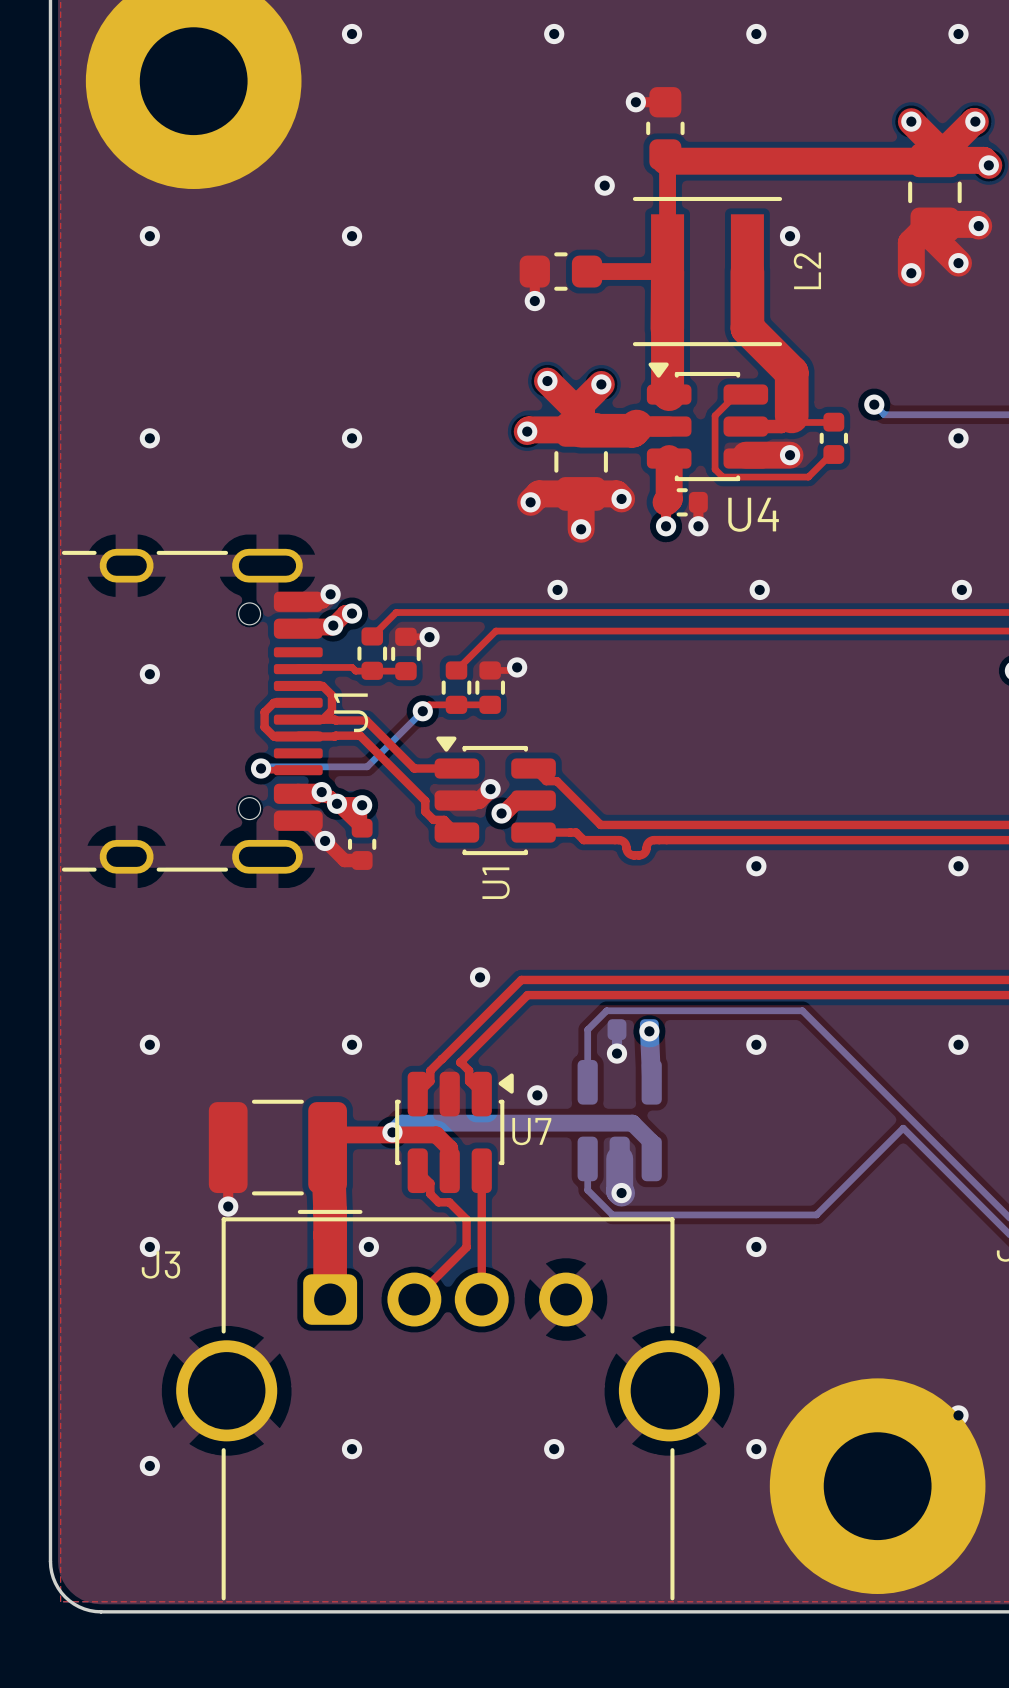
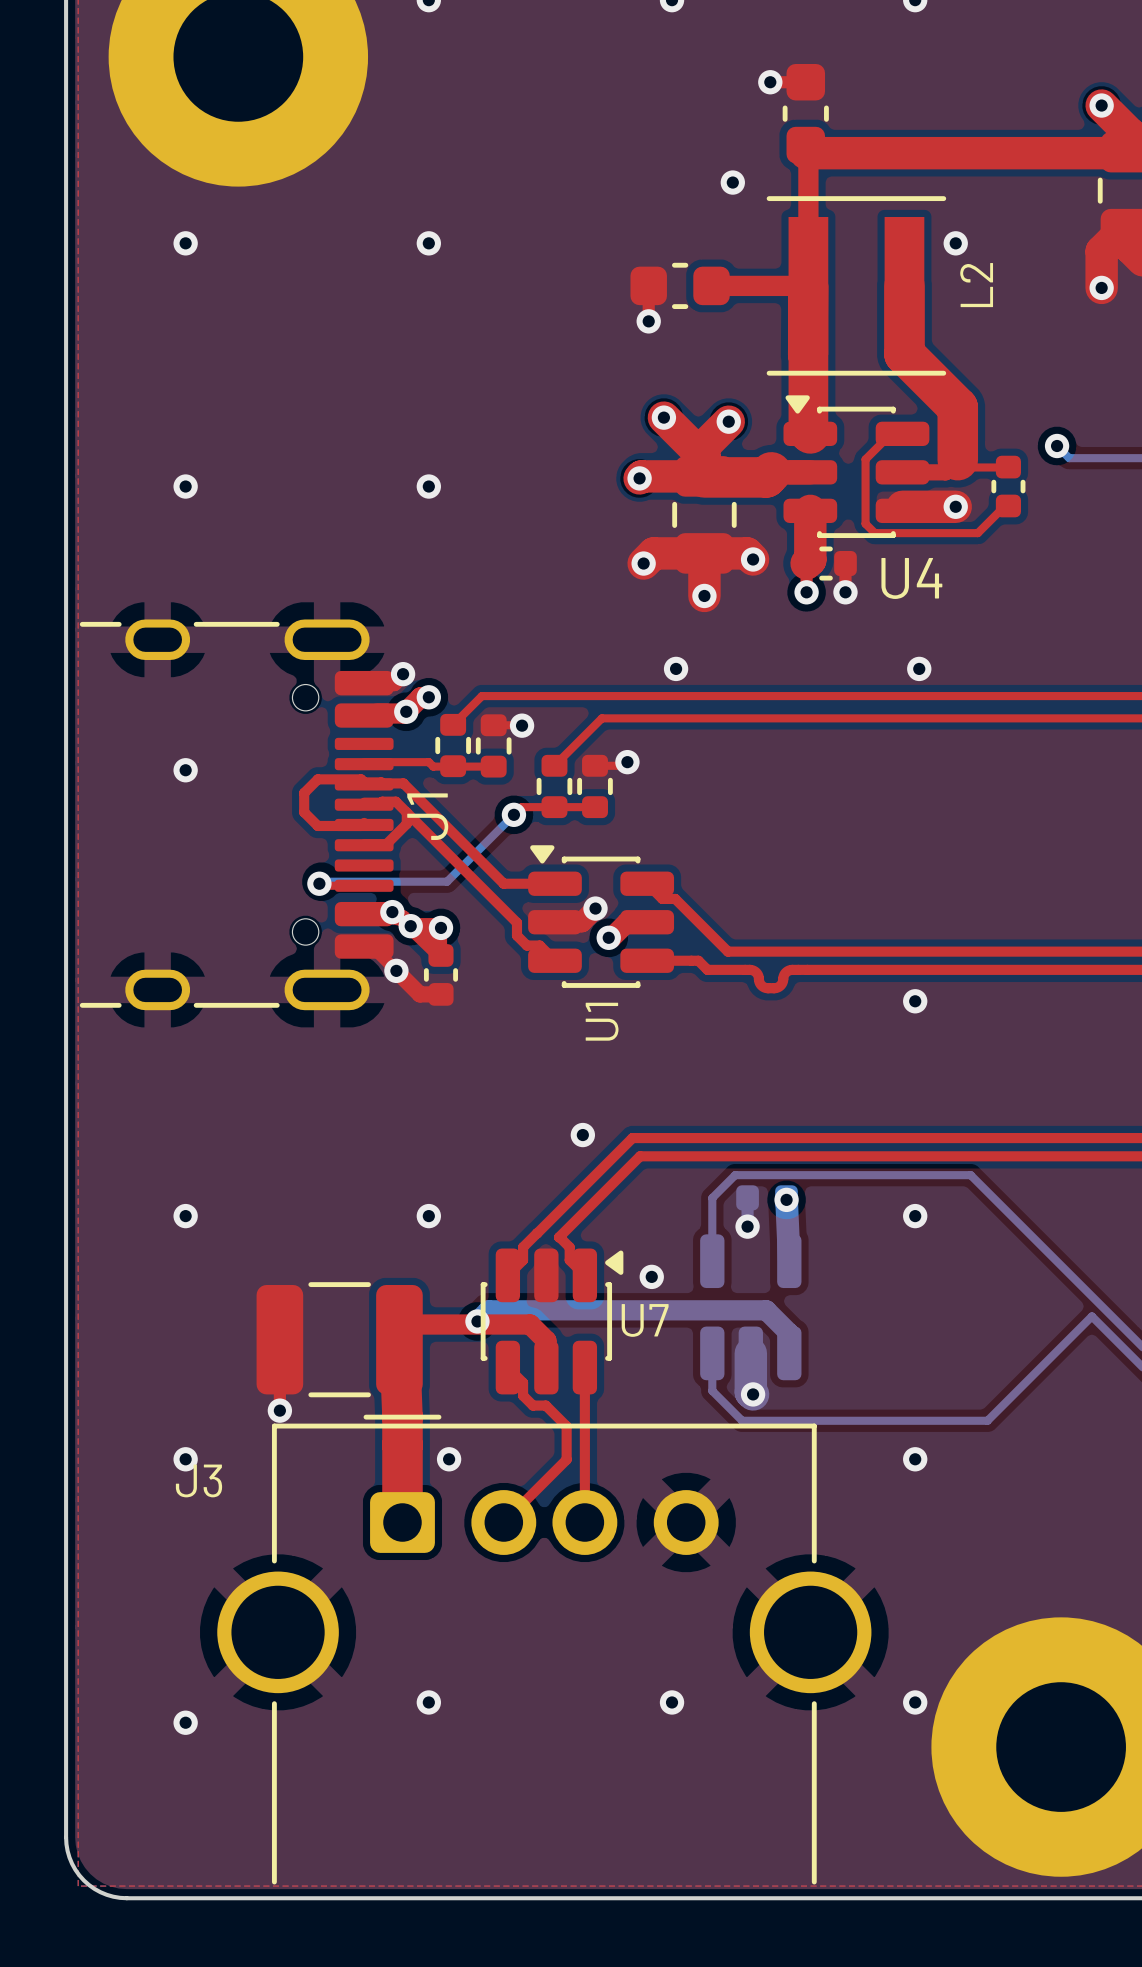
top track: (298, 685) (322, 685) (331, 695) (331, 710) (322, 719) -> none
top track: (298, 702) (273, 702) (264, 712) (264, 727) (273, 736) (360, 735) -> (364, 802) (395, 801) (438, 844)
top track: none -> (406, 812) (406, 823) (387, 843)
top track: (298, 719) (366, 720) -> (364, 822) (361, 825) (317, 825) (304, 812) (304, 793) (317, 779) (361, 779) (364, 782) (403, 783) (446, 825)

